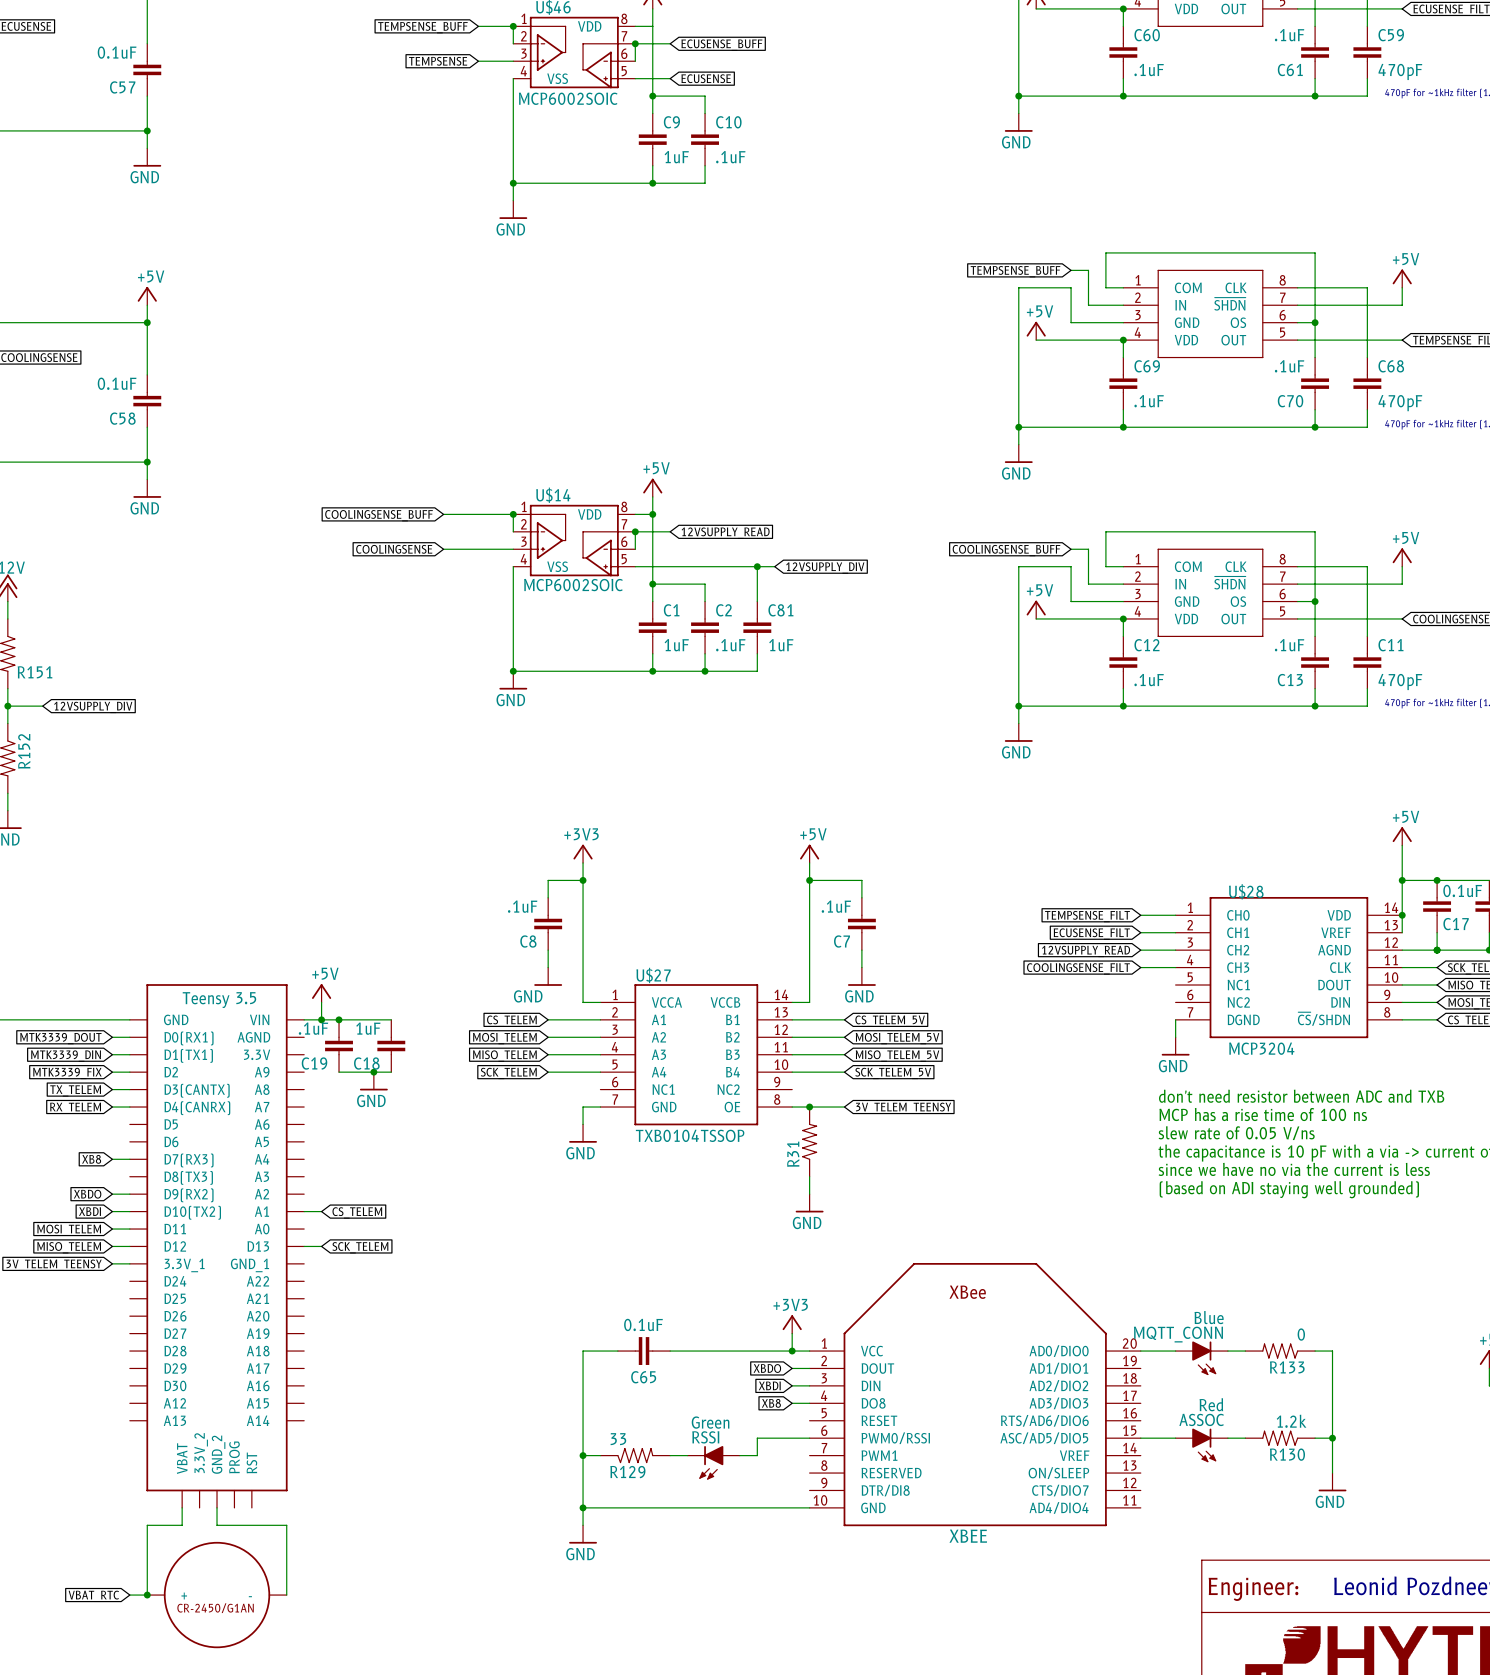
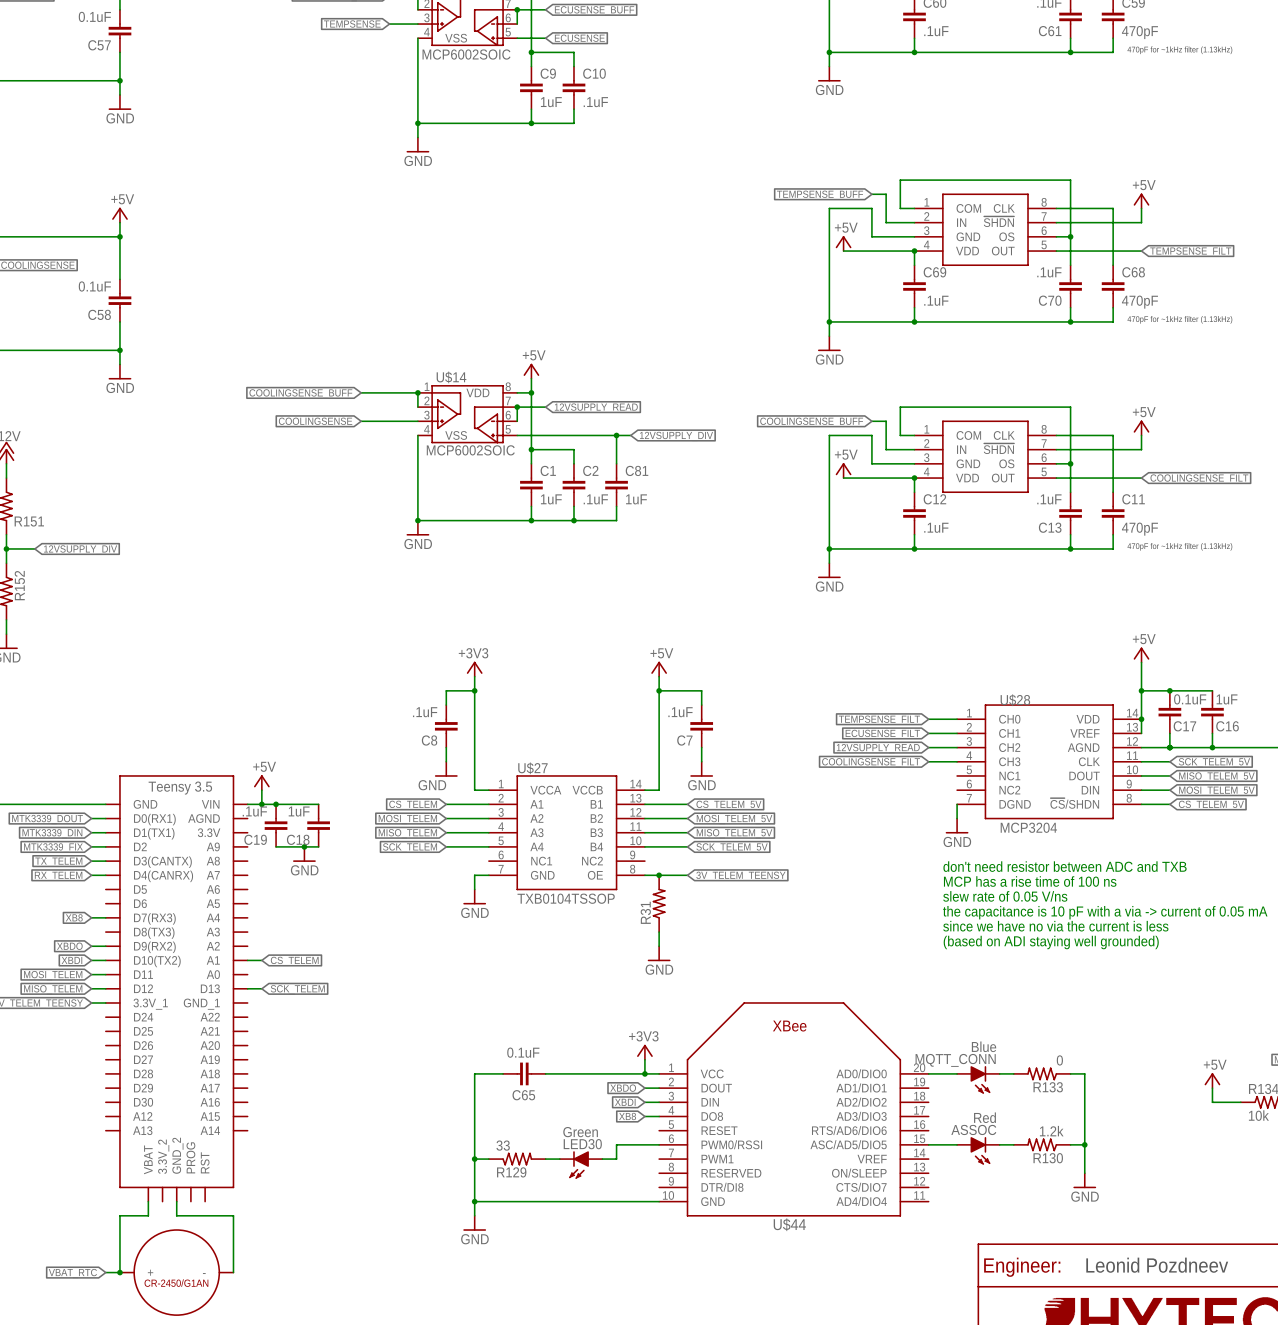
RSSI name: RSSI (705, 1437) -> LED30 (582, 1144)
XBEE name: XBEE (968, 1536) -> U$44 (789, 1224)

